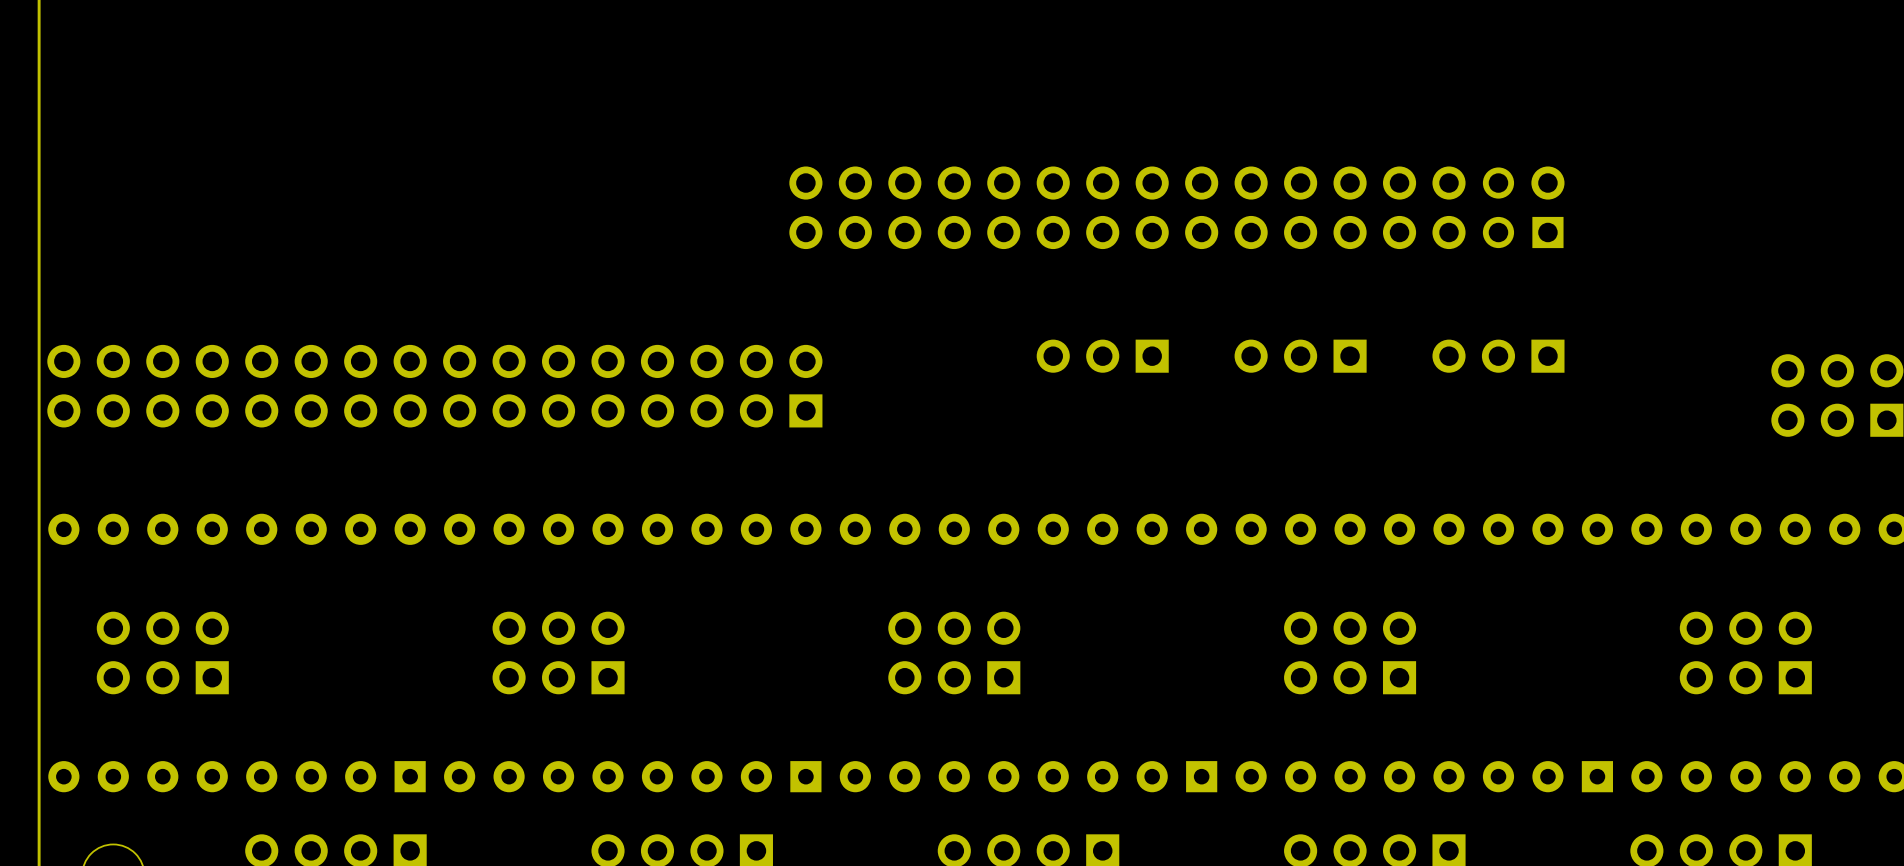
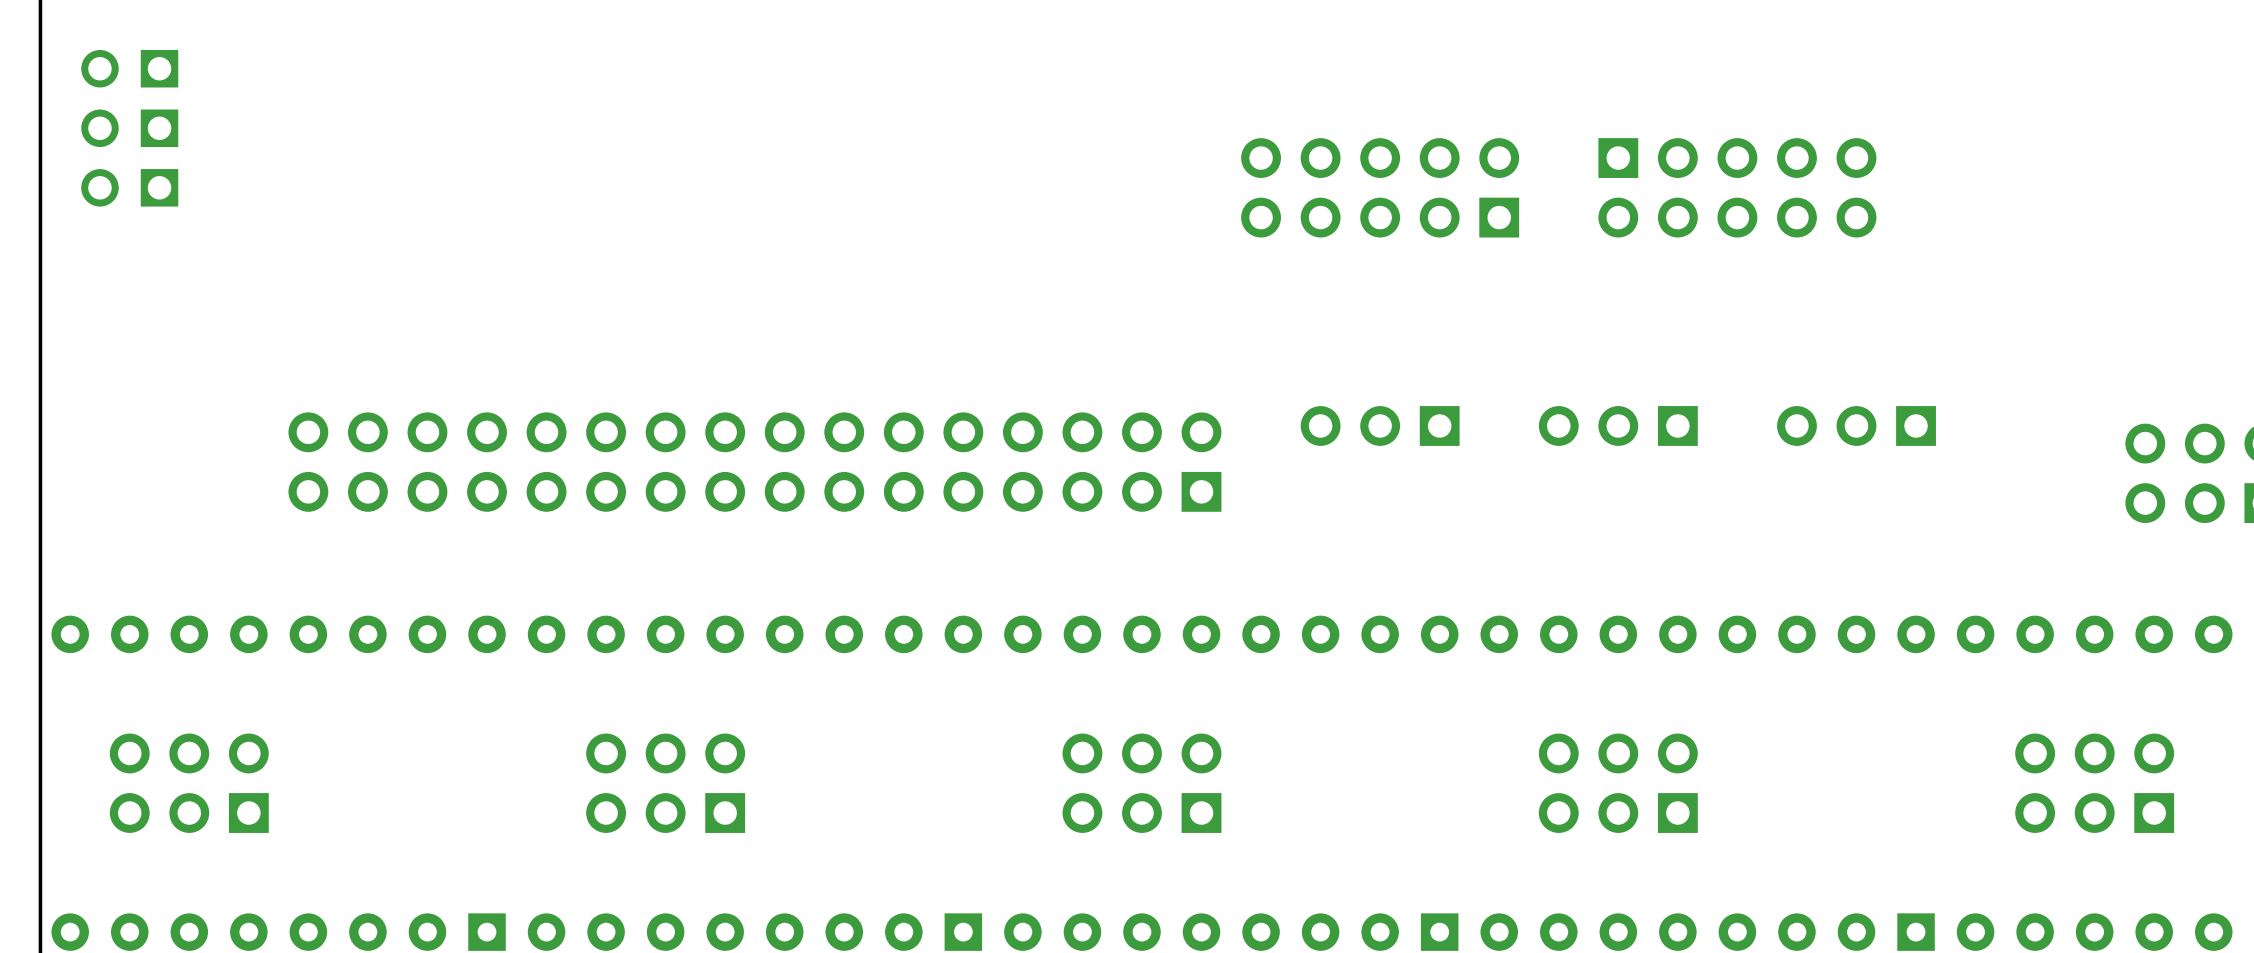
part: none -> (129, 68)
part: none -> (129, 128)
part: none -> (129, 187)
part: none -> (1380, 187)
part: none -> (1737, 187)
part: (1176, 207) -> none
part position: (1102, 356) -> (1380, 425)
part position: (1300, 356) -> (1618, 425)
part position: (1498, 356) -> (1856, 425)
part position: (434, 386) -> (754, 462)

